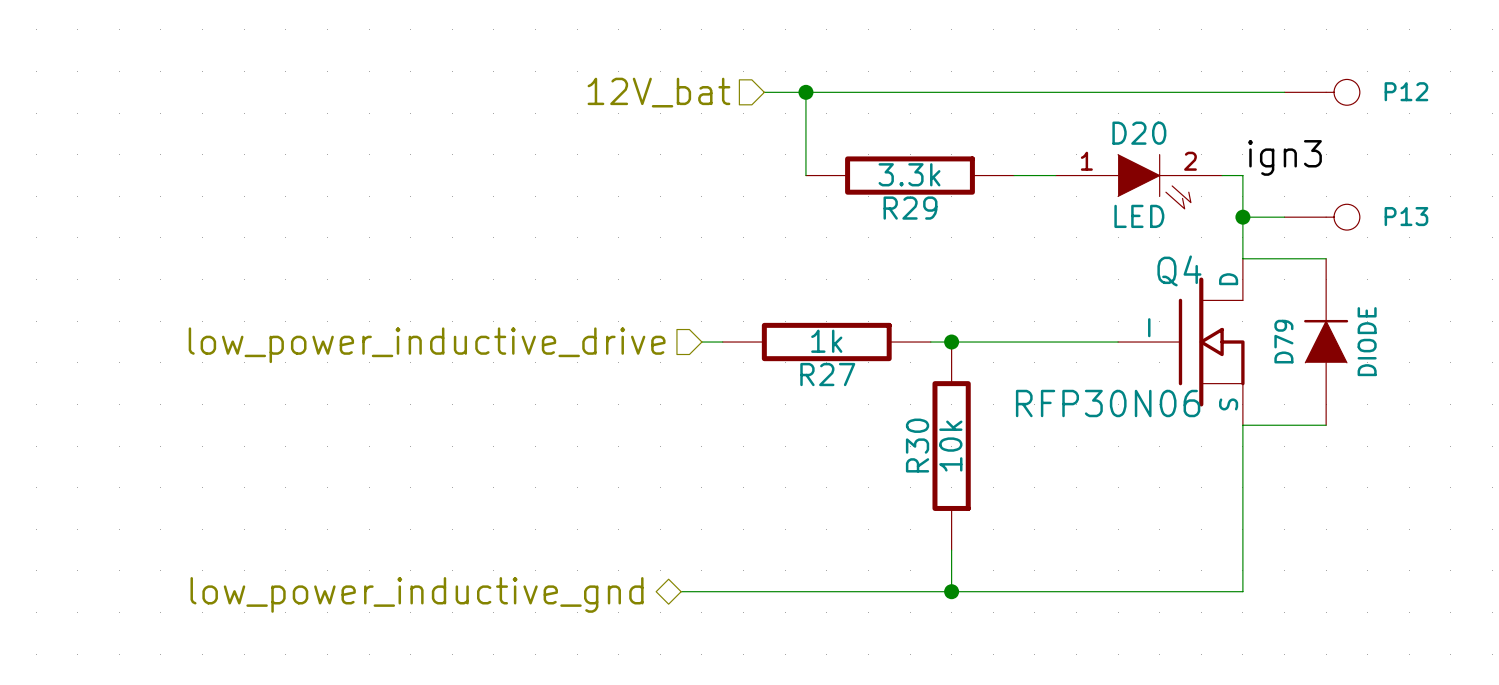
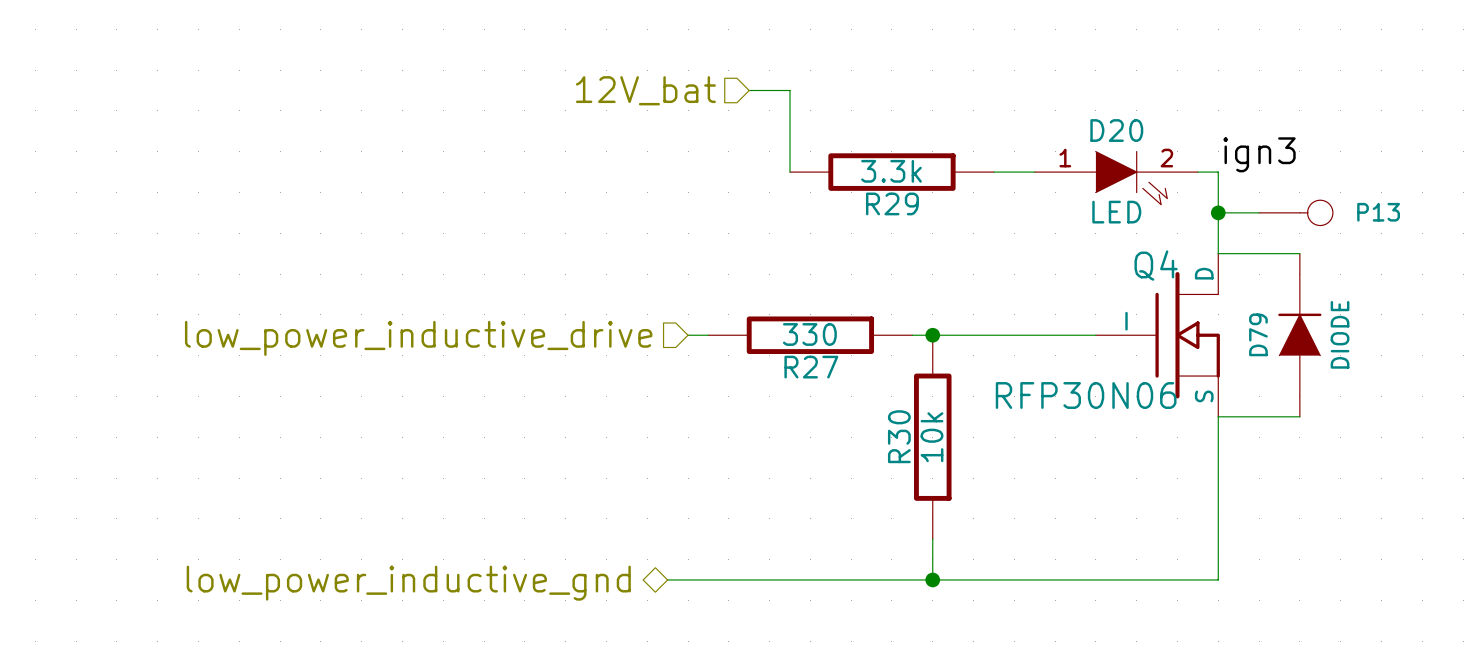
wire: (805, 92) (1284, 92) -> none
junction: (805, 92) -> none
P12: (1322, 92) -> none
R27 value: 1k (826, 341) -> 330 (809, 334)

